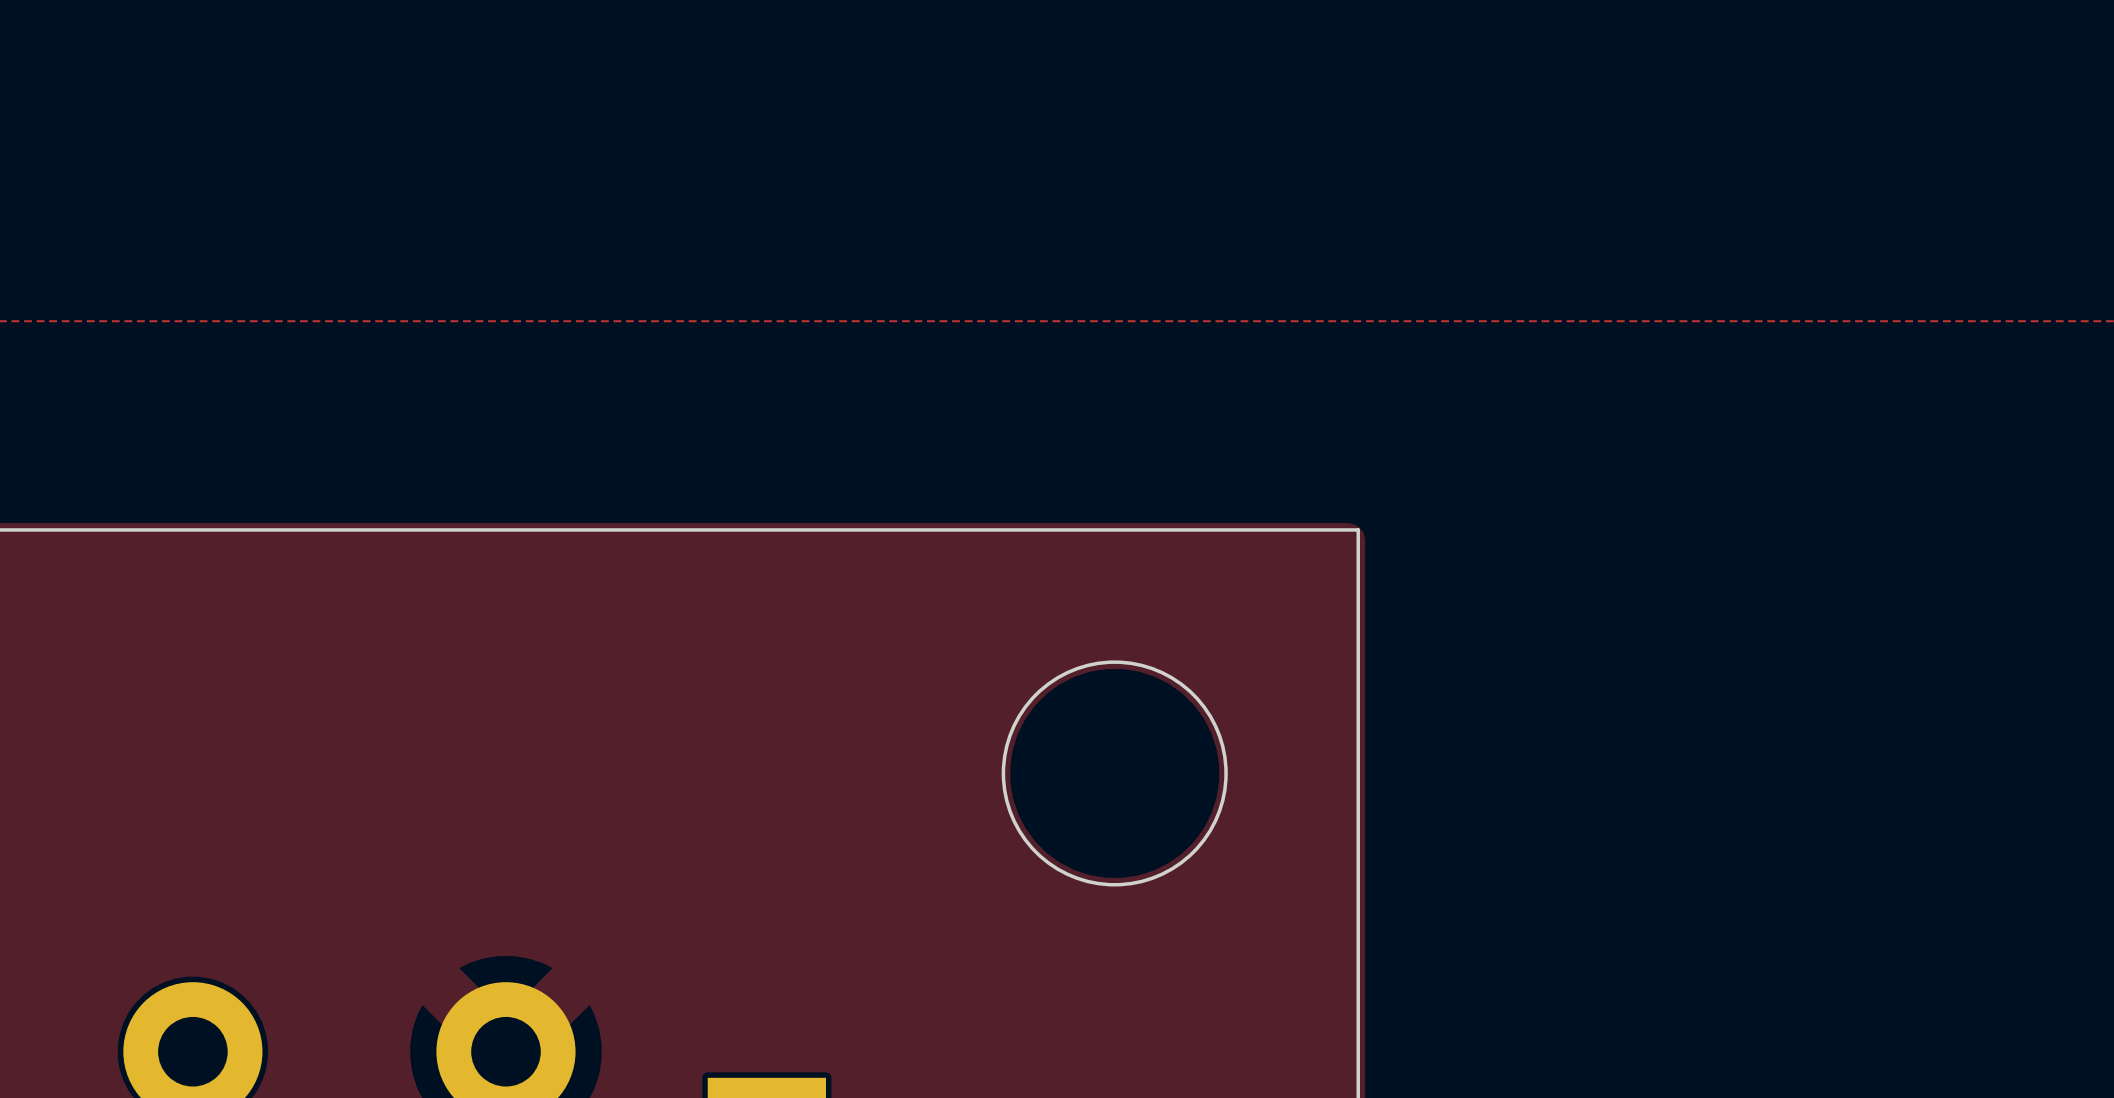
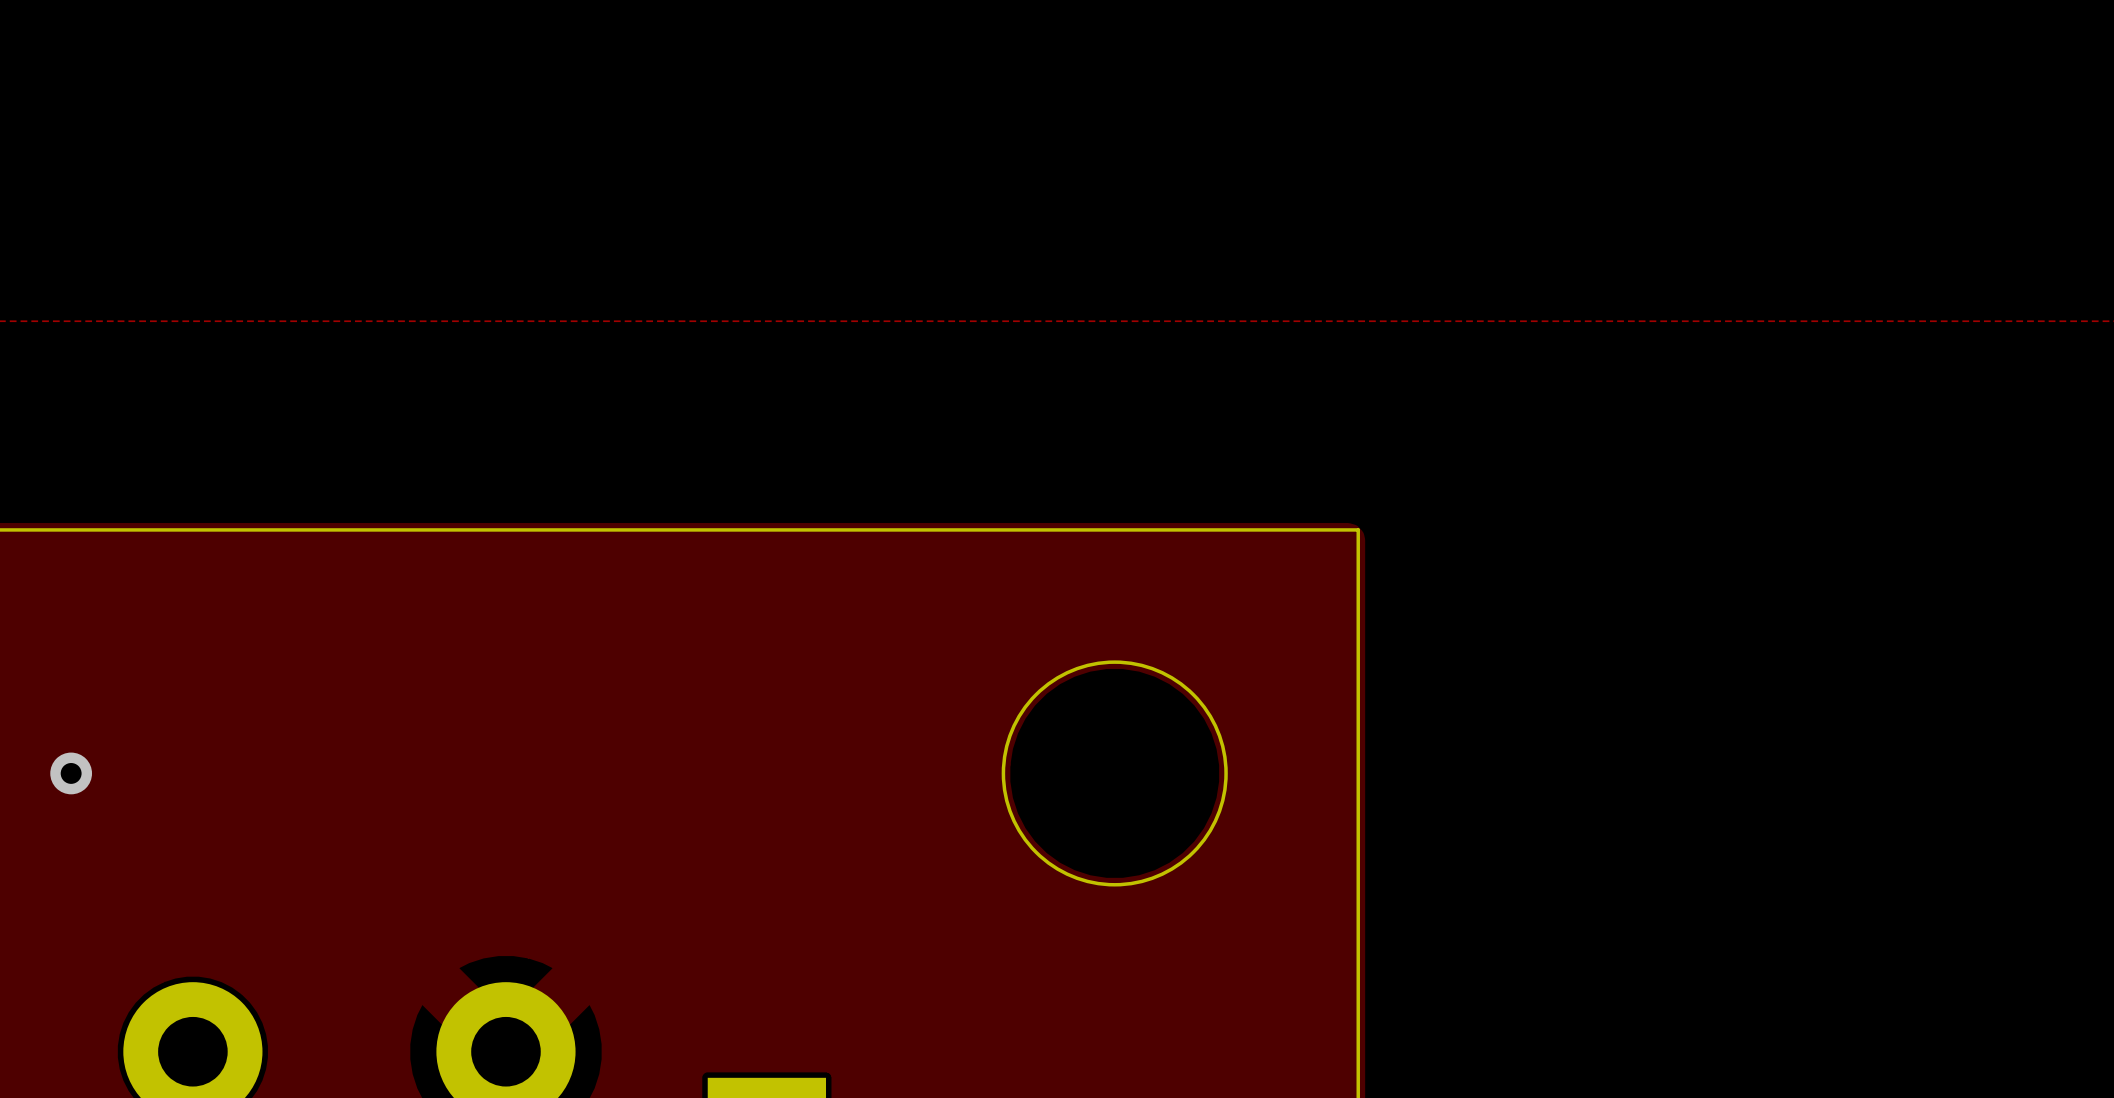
via: none -> (71, 773)

